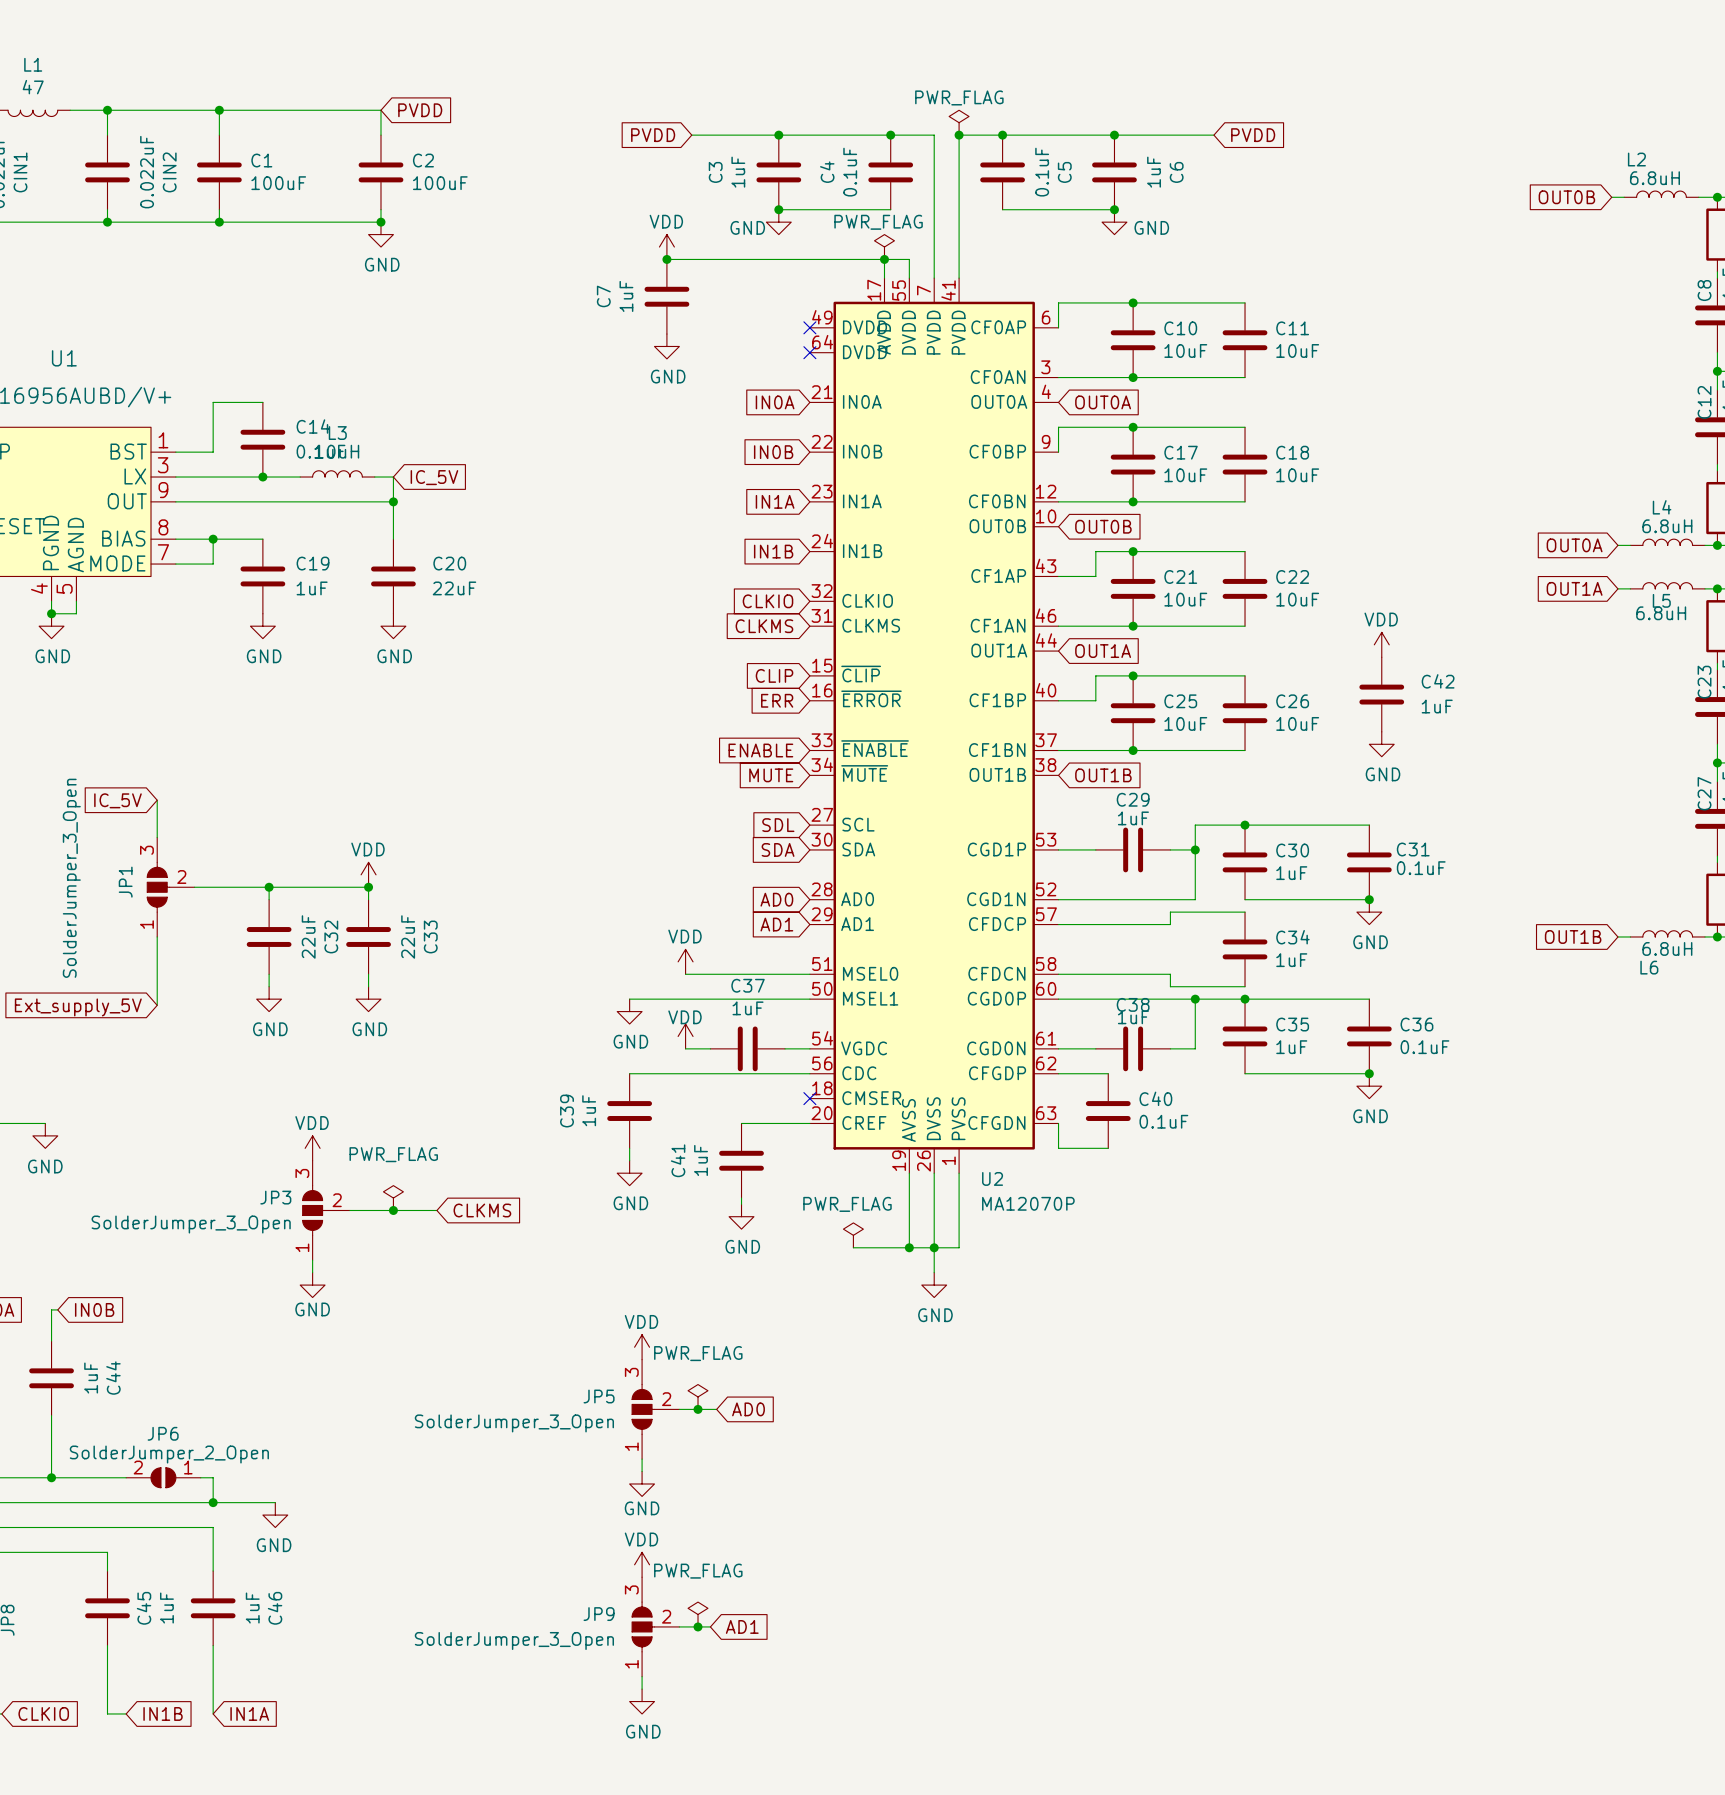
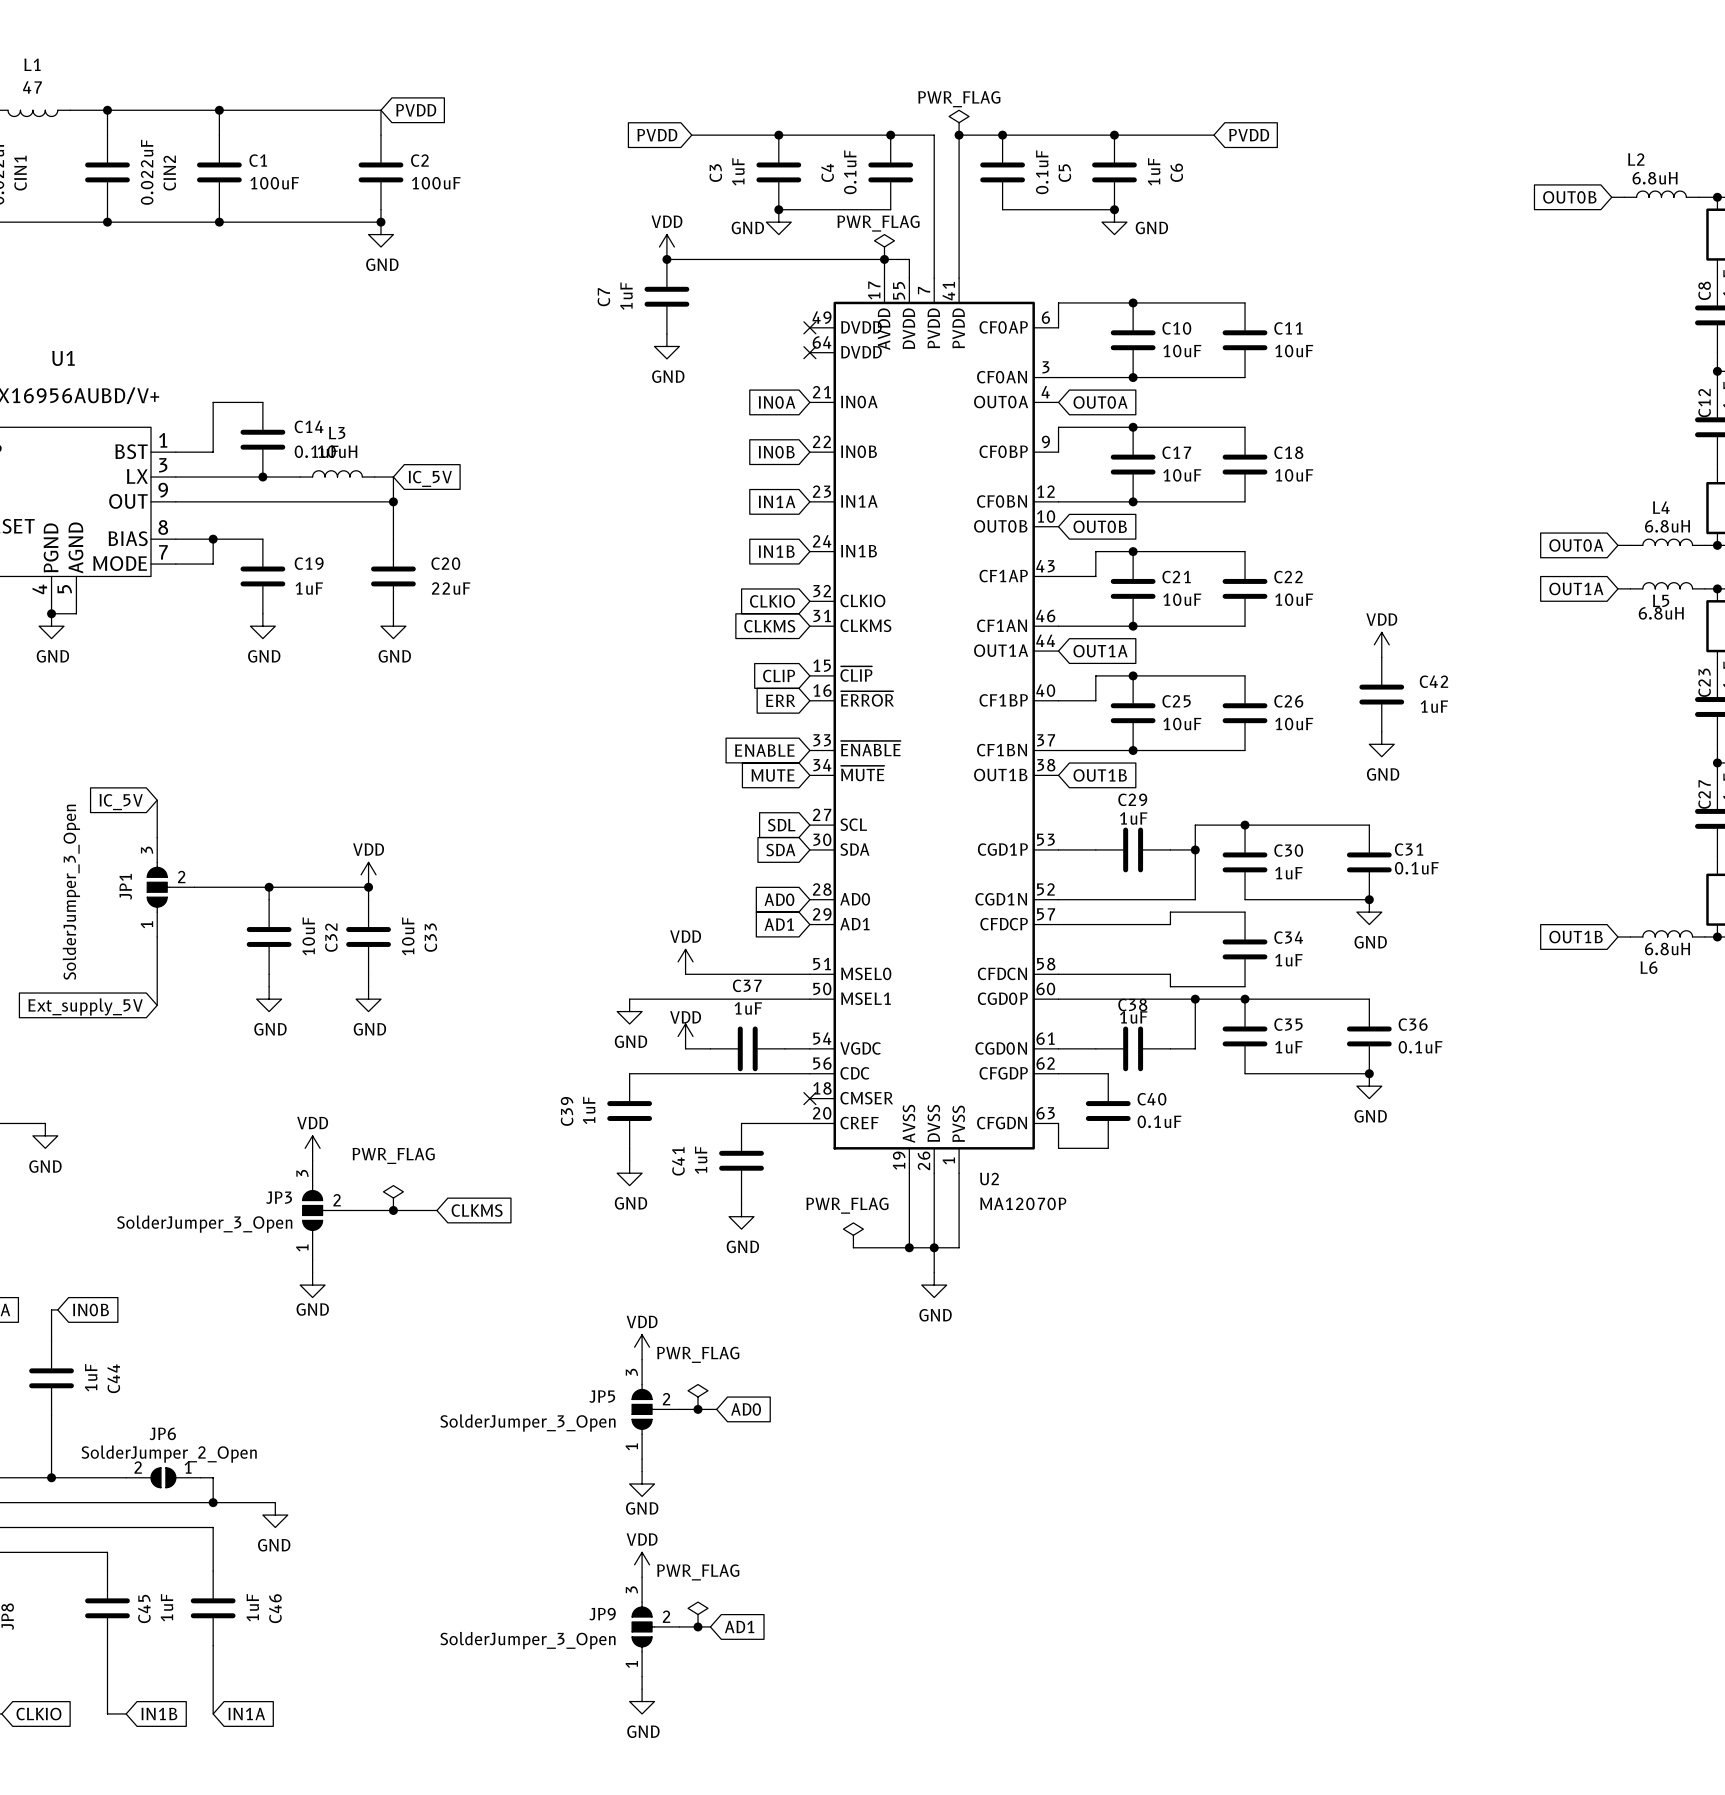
C32 value: 22uF (308, 936) -> 10uF (308, 936)
C33 value: 22uF (408, 936) -> 10uF (408, 936)

